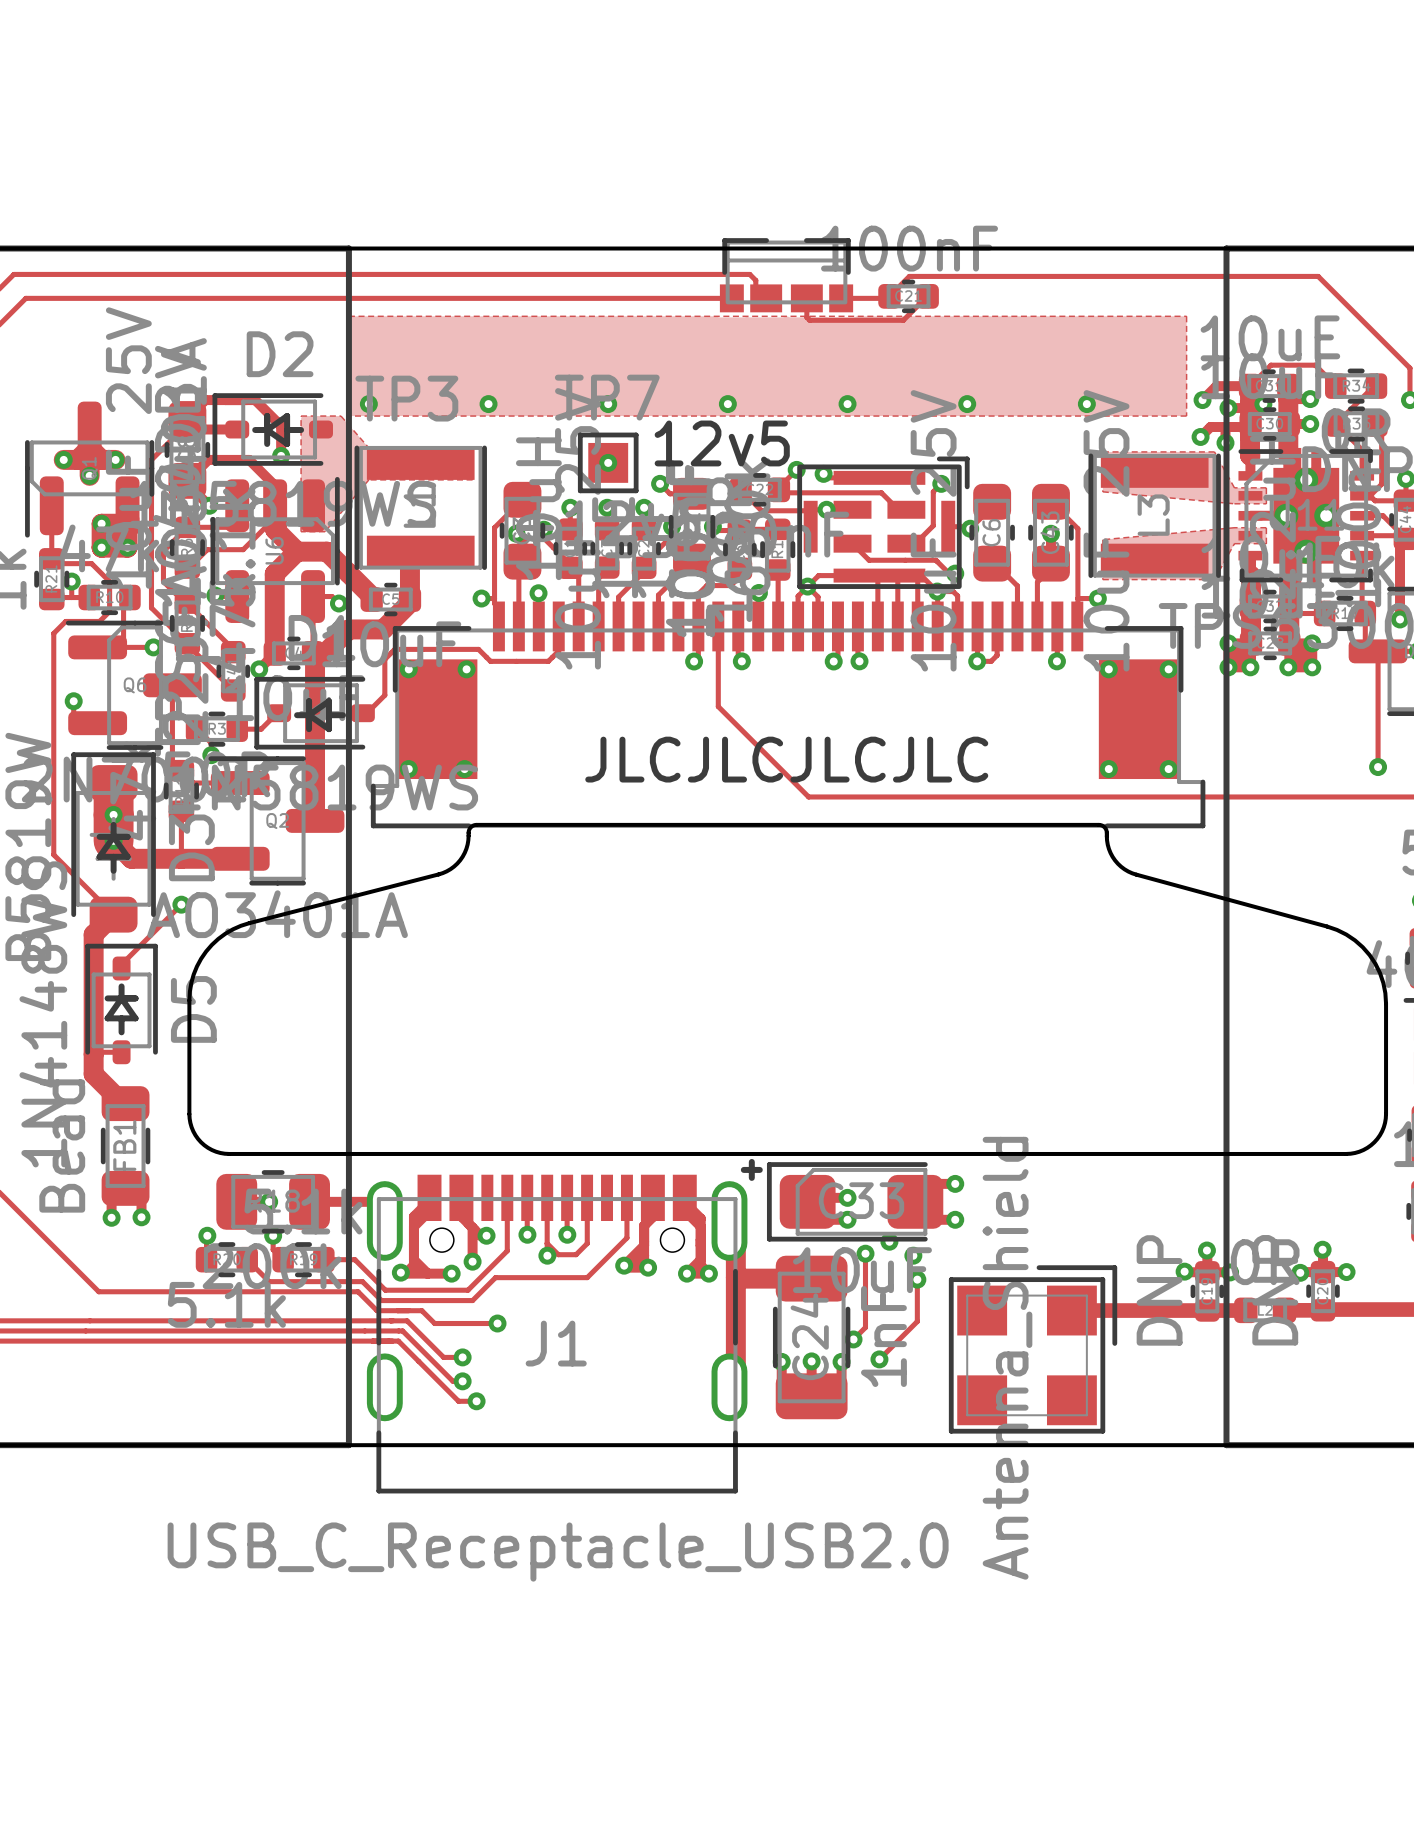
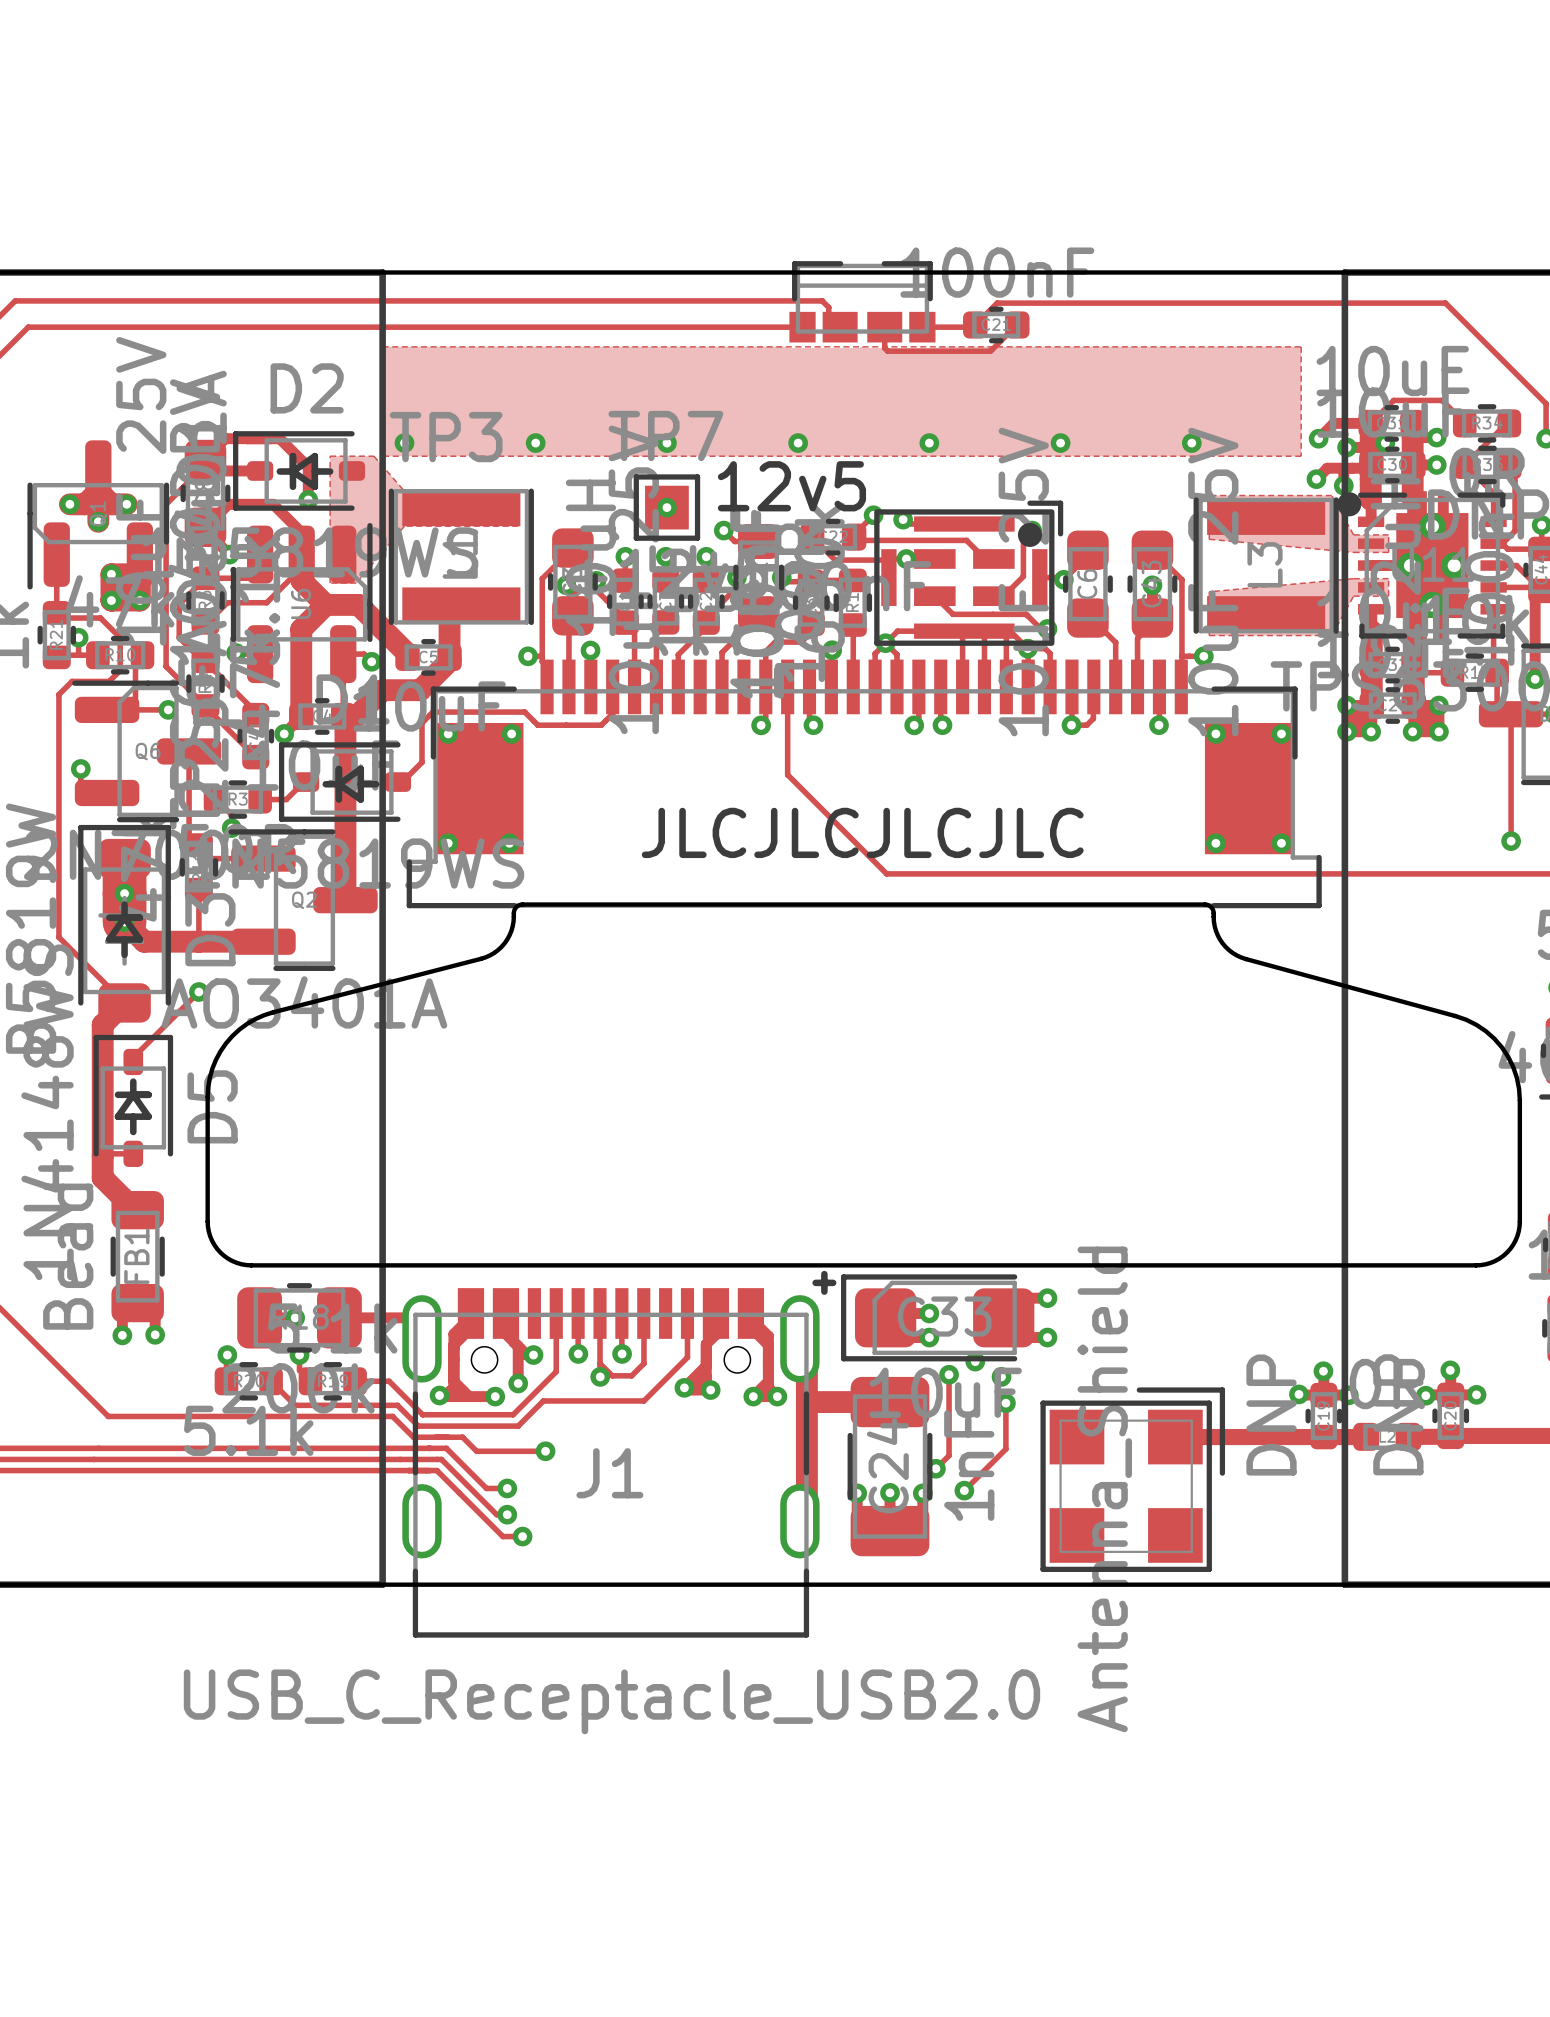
drawing: none -> [1337, 492, 1362, 517]
drawing: none -> [1017, 522, 1042, 547]

